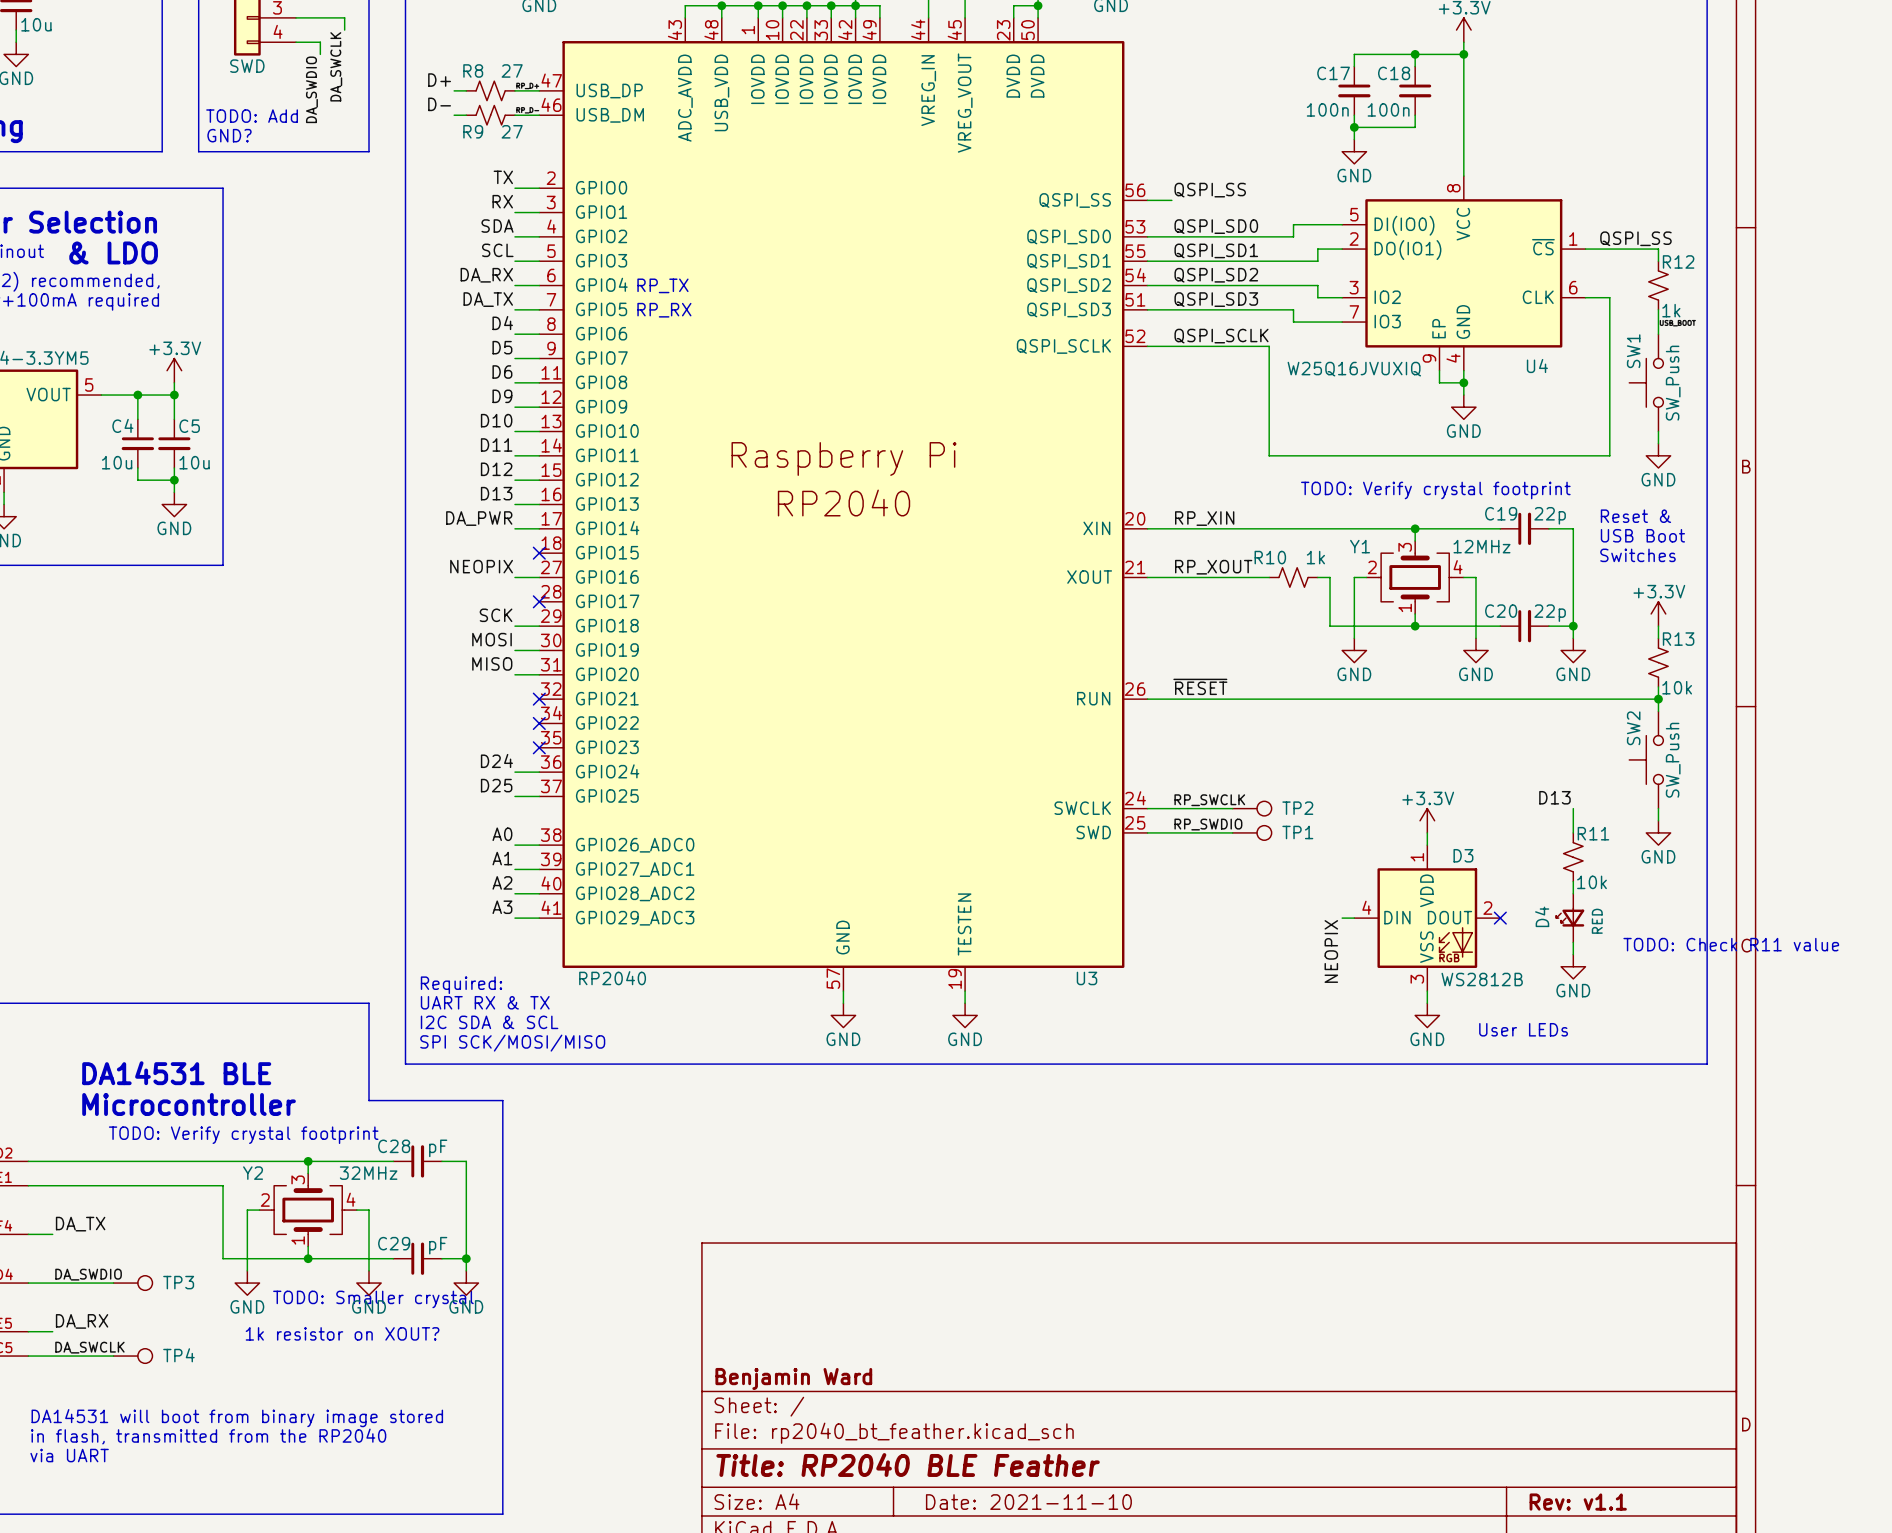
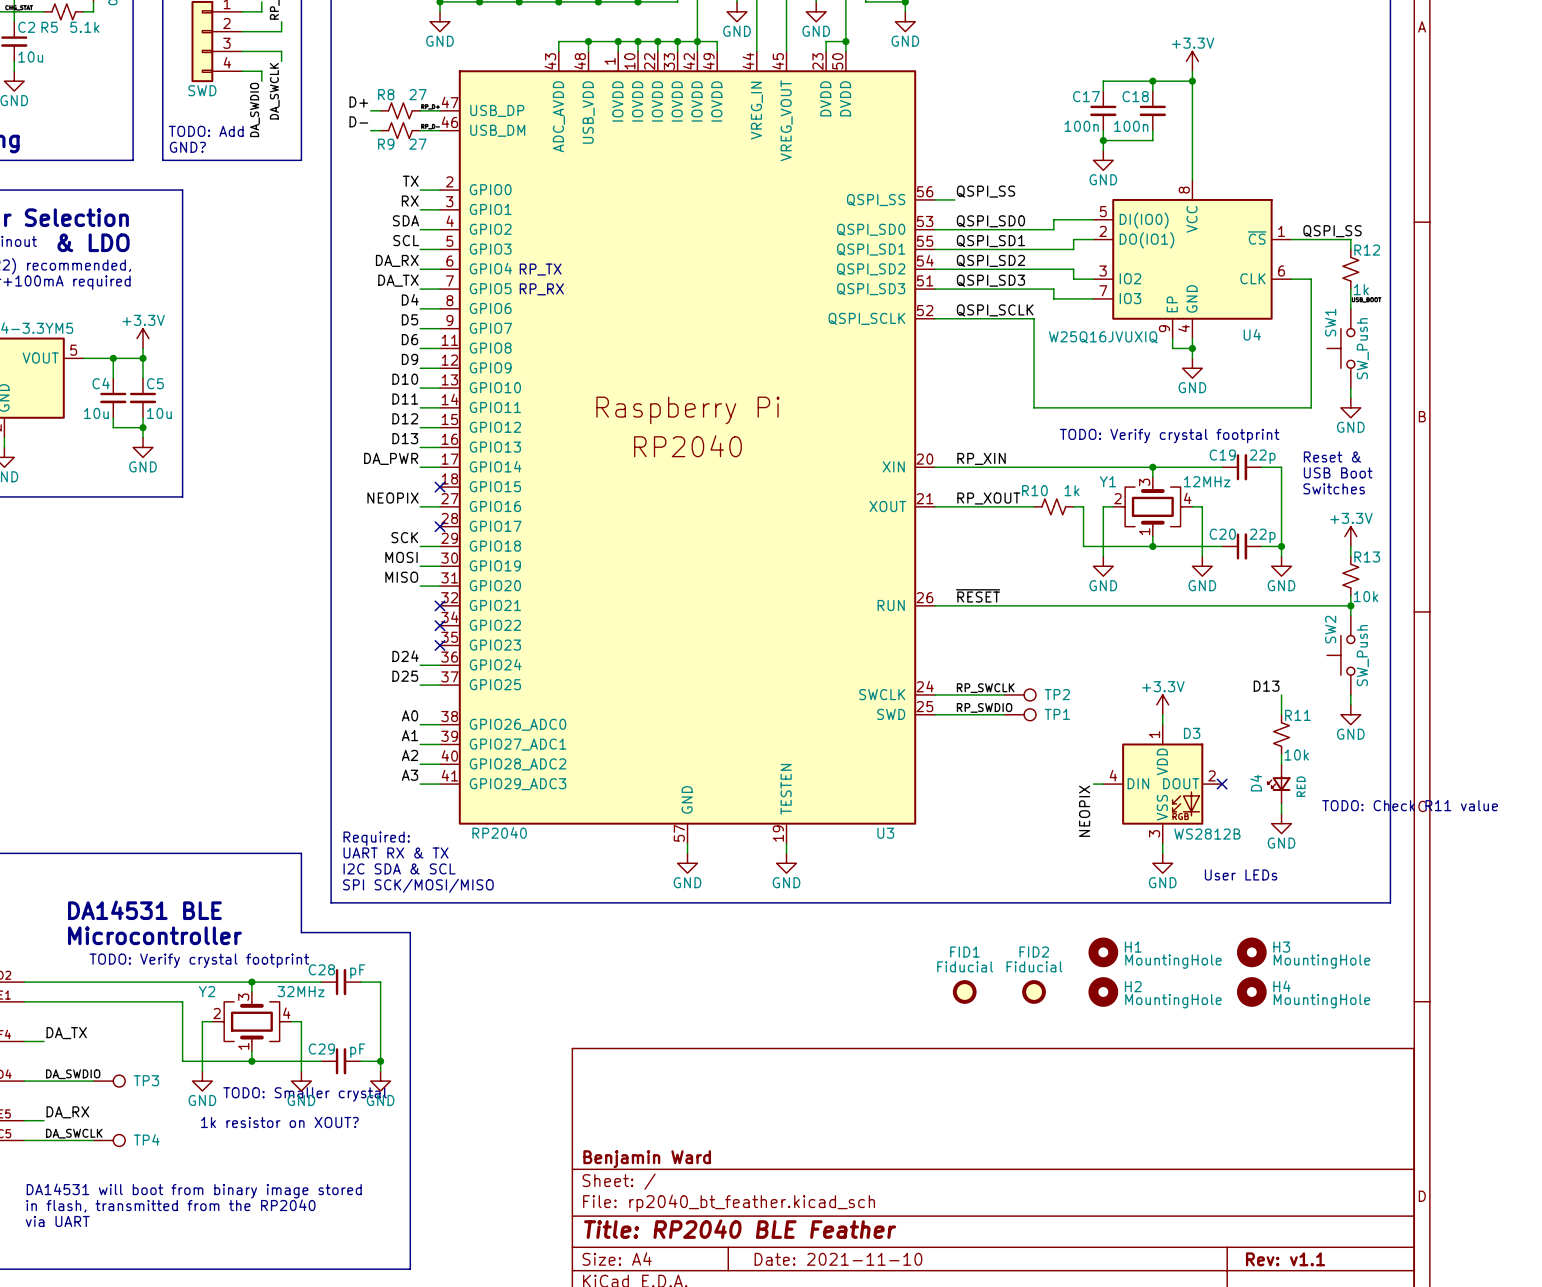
H1: none -> MountingHole (1103, 952)
H3: none -> MountingHole (1251, 952)
FID1: none -> Fiducial (964, 991)
FID2: none -> Fiducial (1034, 991)
H2: none -> MountingHole (1103, 991)
H4: none -> MountingHole (1251, 991)

